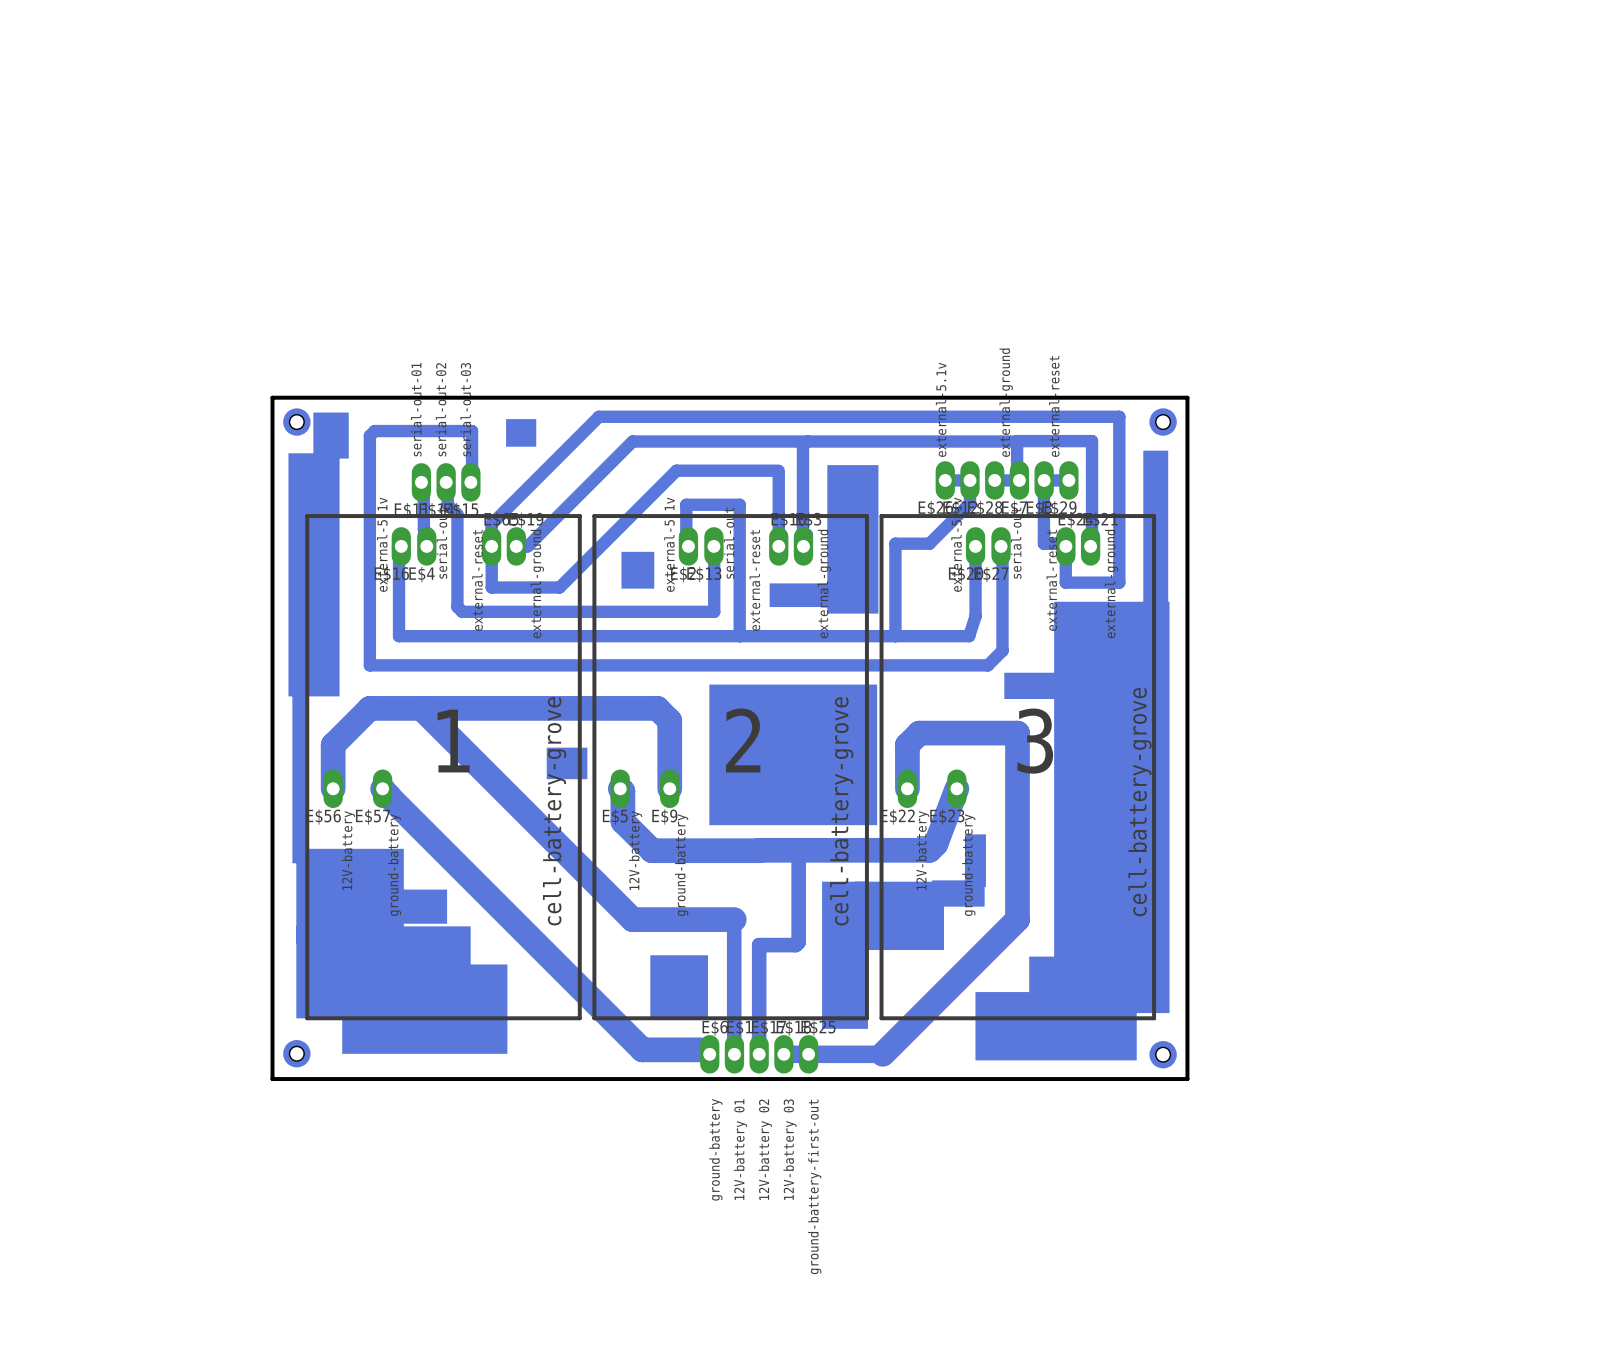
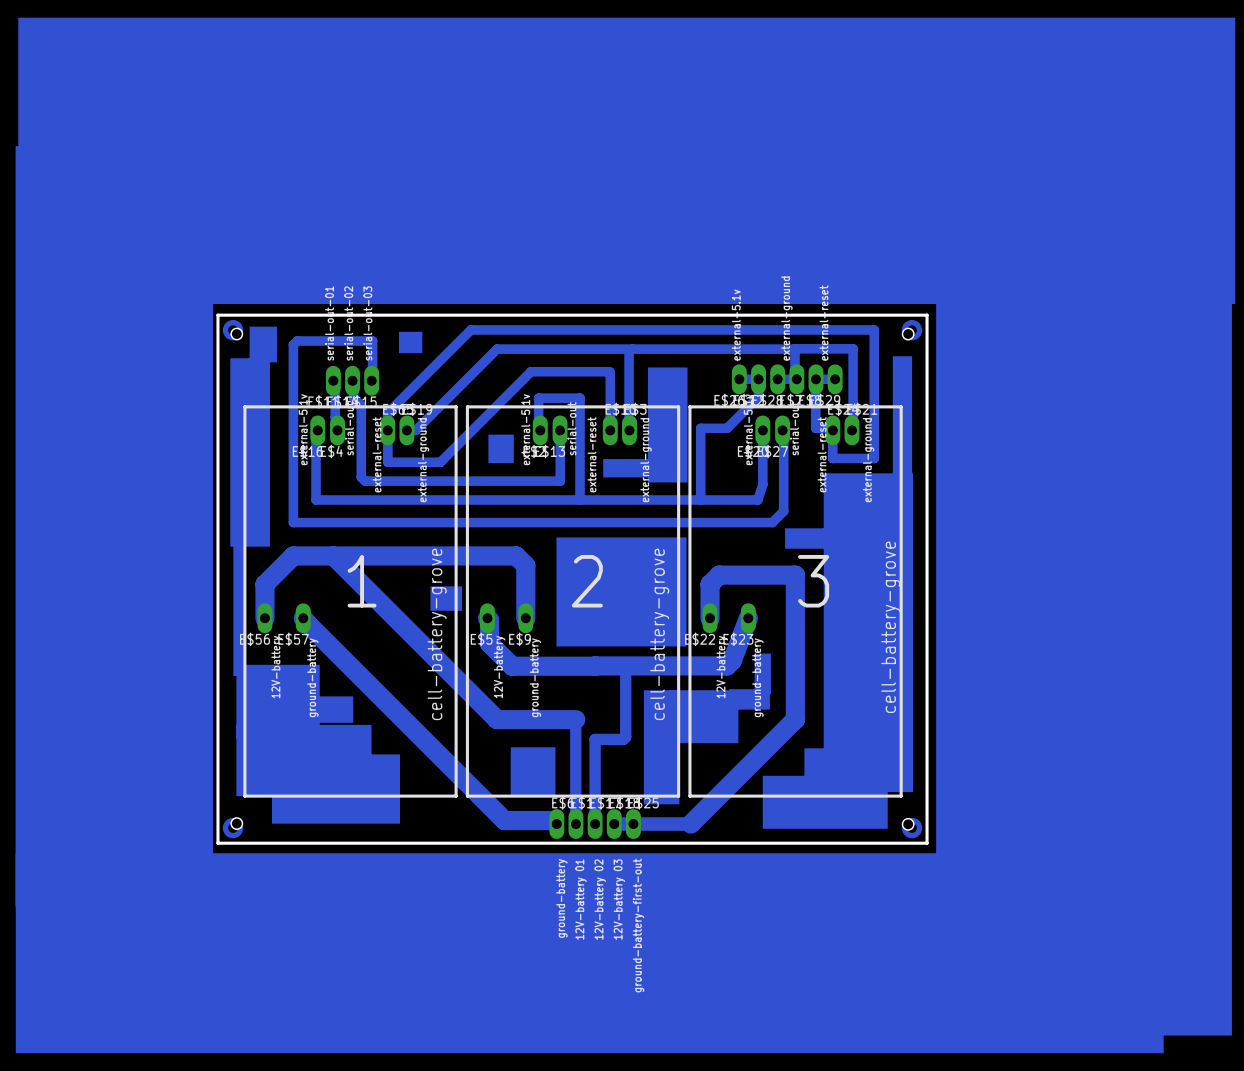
drawing: none -> [15, 17, 1236, 1054]
drawing shape: [283, 408, 311, 436] -> [222, 320, 244, 341]
drawing shape: [1149, 408, 1177, 436] -> [901, 320, 923, 341]
drawing shape: [283, 1040, 311, 1068] -> [222, 817, 244, 839]
drawing shape: [1149, 1041, 1177, 1069] -> [901, 817, 923, 839]

